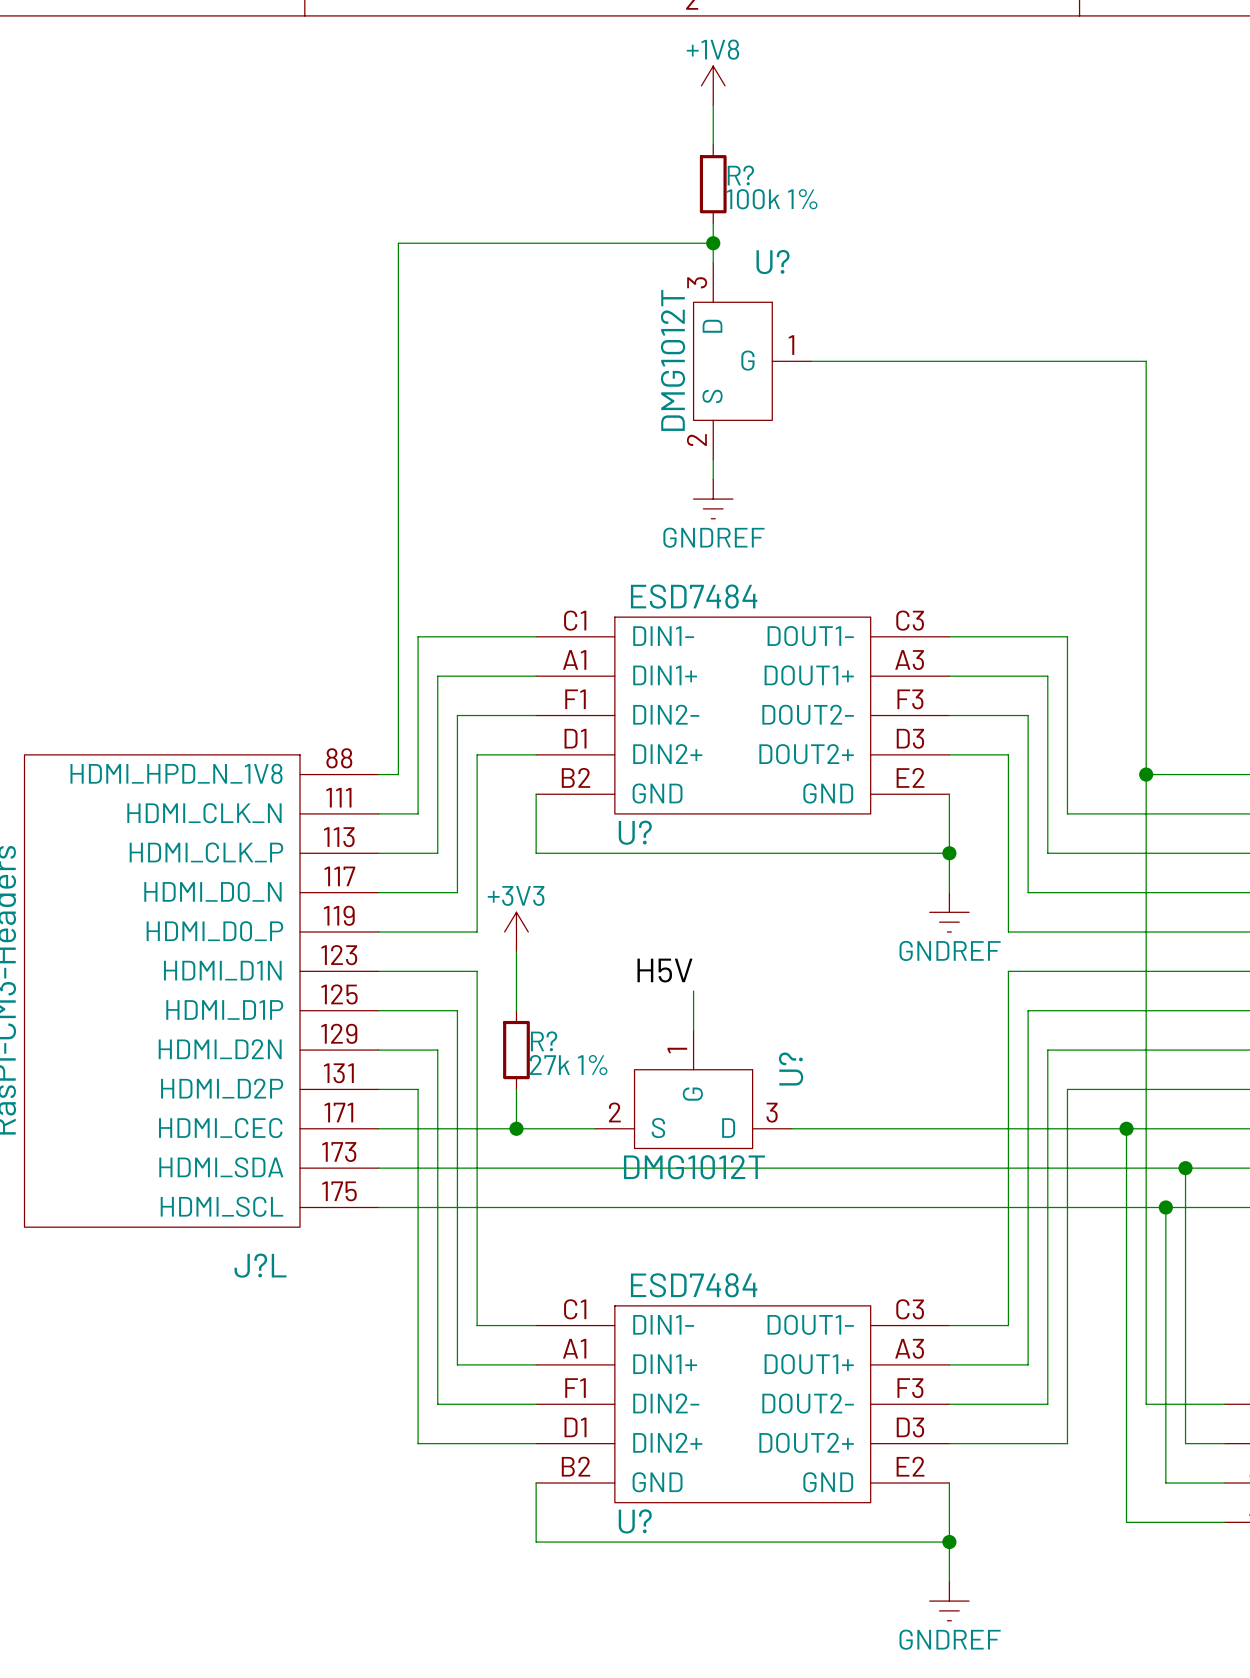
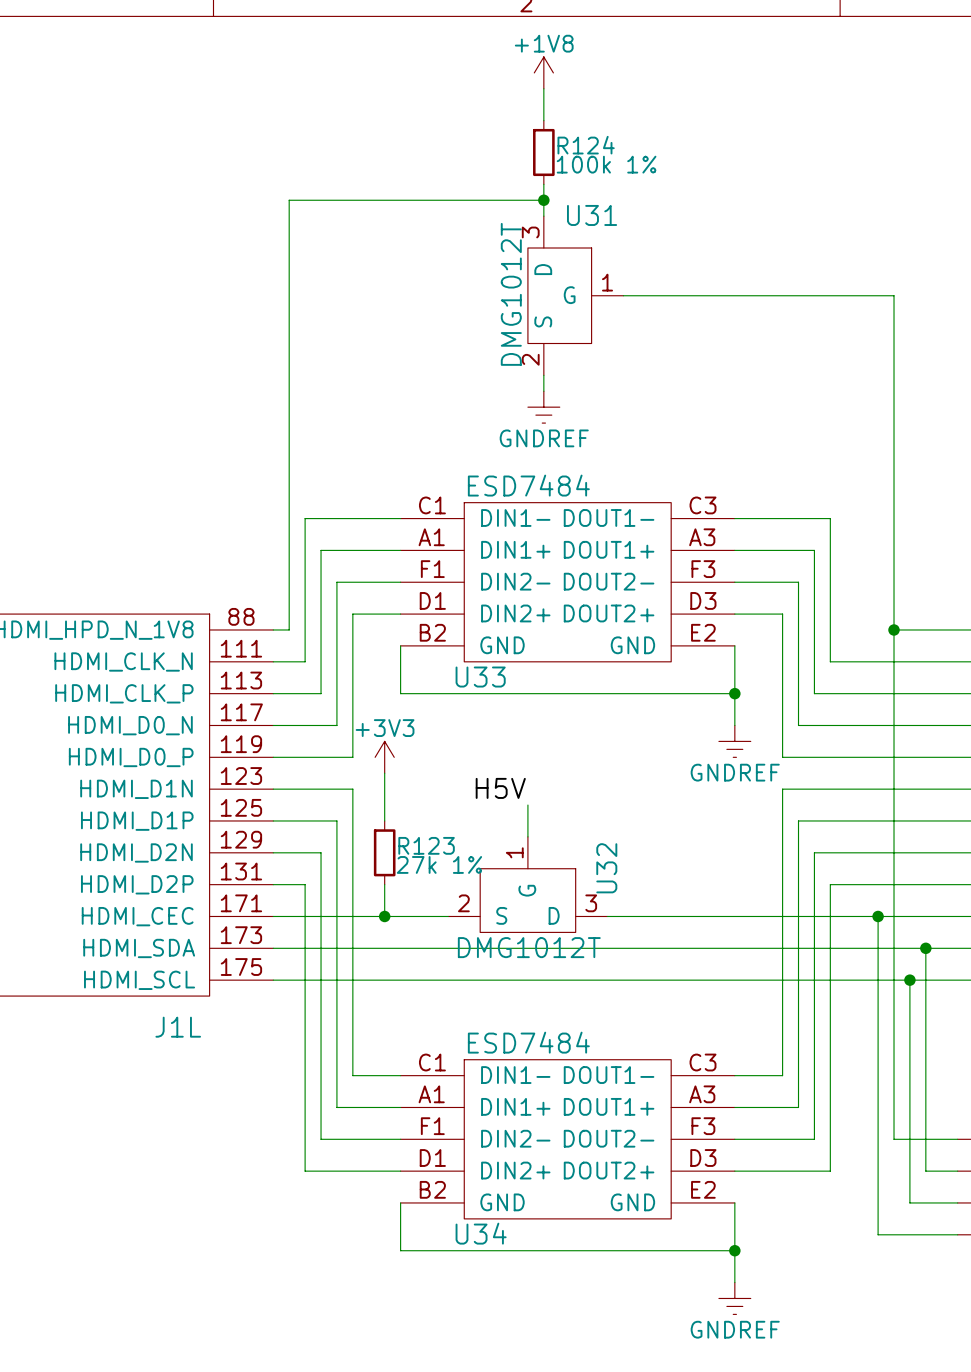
R? name: R? (740, 175) -> R124 (586, 145)
U? name: U? (773, 262) -> U31 (592, 215)
U? name: U? (635, 832) -> U33 (480, 677)
R? name: R? (544, 1041) -> R123 (426, 845)
U? name: U? (791, 1069) -> U32 (606, 868)
J?L name: J?L (260, 1265) -> J1L (178, 1027)
U? name: U? (635, 1521) -> U34 (481, 1233)

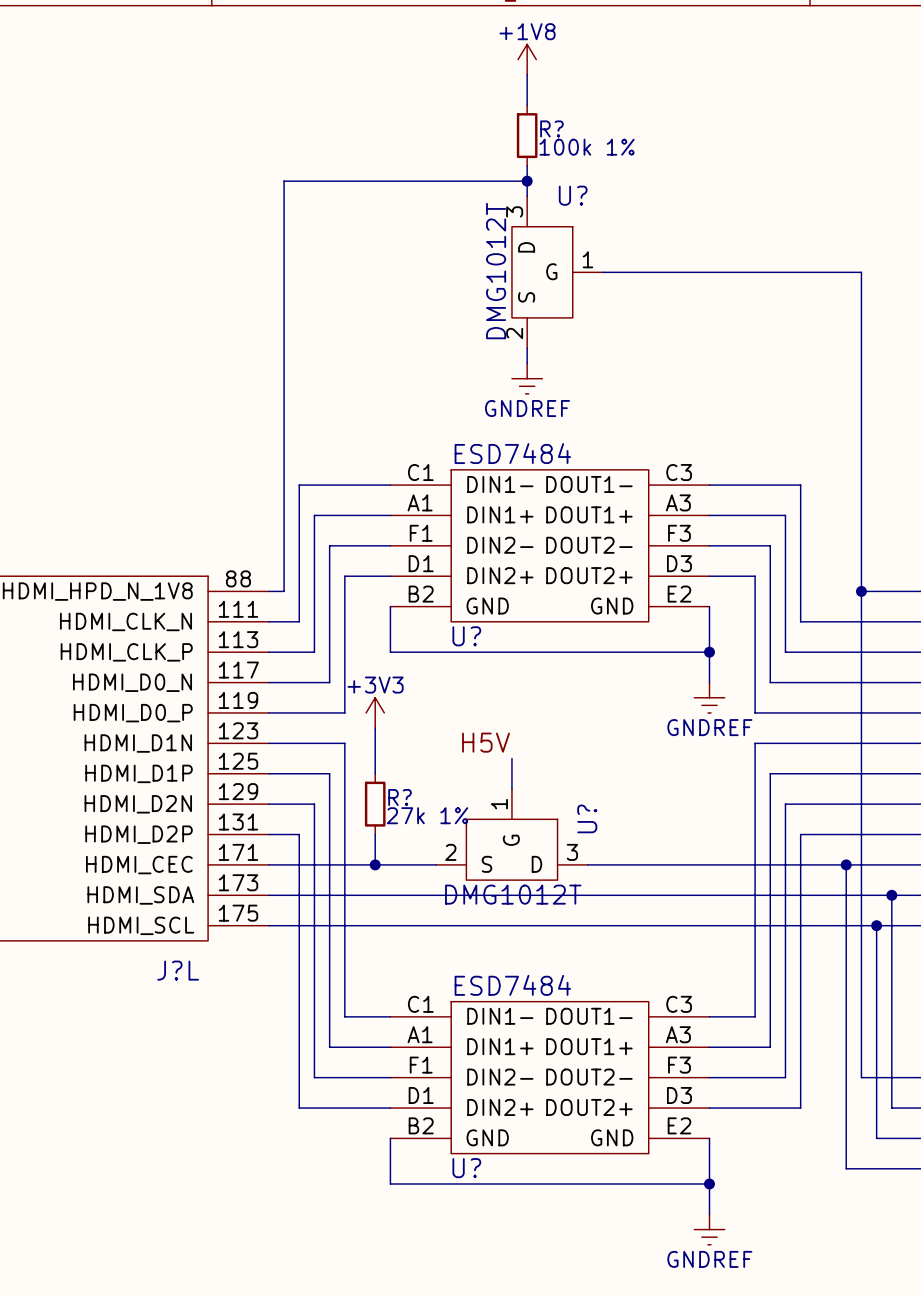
R124 name: R124 (586, 145) -> R? (551, 128)
U31 name: U31 (592, 215) -> U? (573, 195)
U33 name: U33 (480, 677) -> U? (466, 636)
R123 name: R123 (426, 845) -> R? (400, 797)
U32 name: U32 (606, 868) -> U? (587, 818)
J1L name: J1L (178, 1027) -> J?L (178, 970)
U34 name: U34 (481, 1233) -> U? (466, 1168)

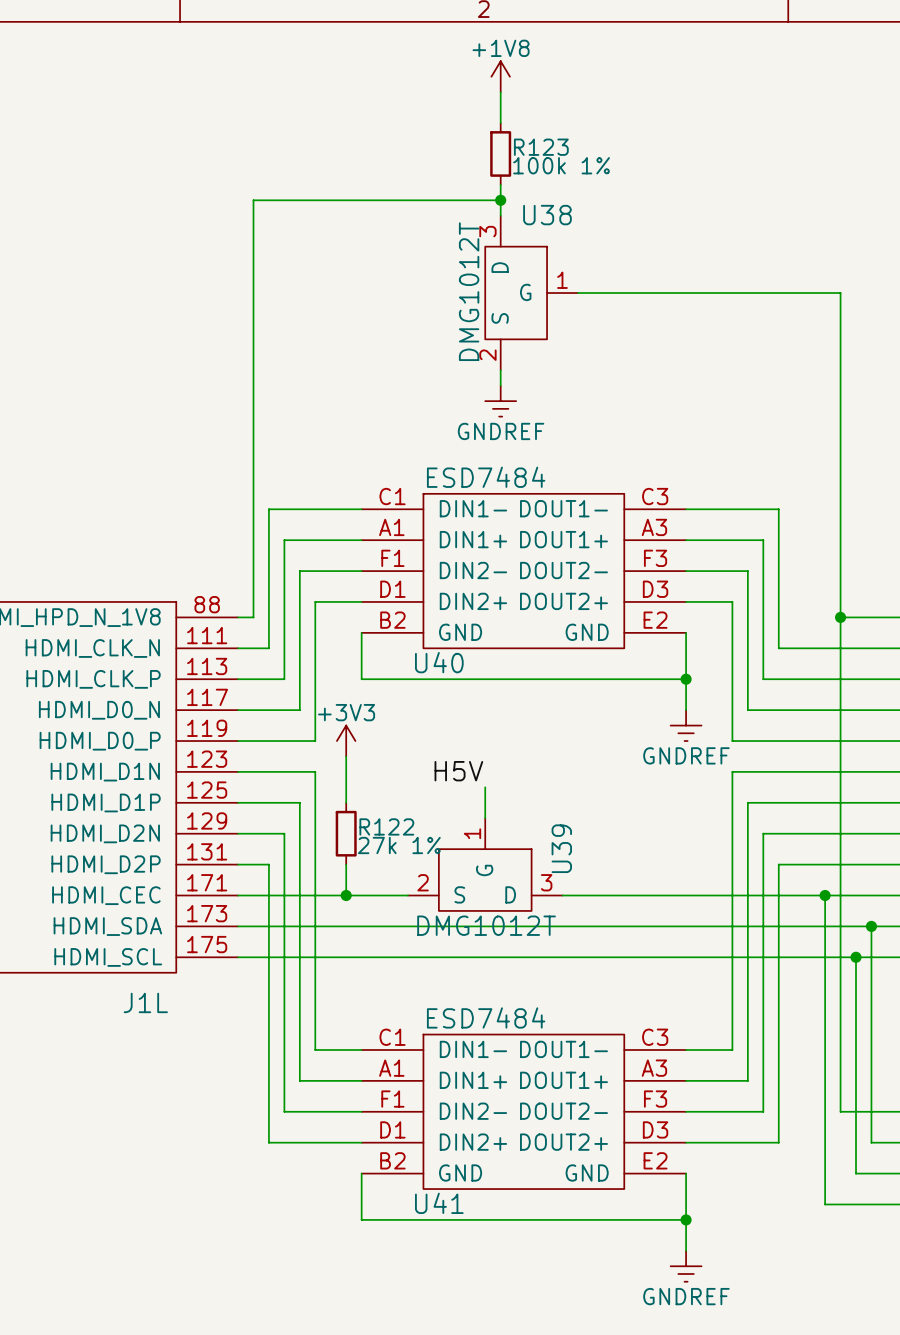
R? name: R? (551, 128) -> R123 (541, 147)
U? name: U? (573, 195) -> U38 (547, 215)
U? name: U? (466, 636) -> U40 (439, 662)
R? name: R? (400, 797) -> R122 (386, 826)
U? name: U? (587, 818) -> U39 (561, 848)
J?L name: J?L (178, 970) -> J1L (145, 1002)
U? name: U? (466, 1168) -> U41 (439, 1203)

